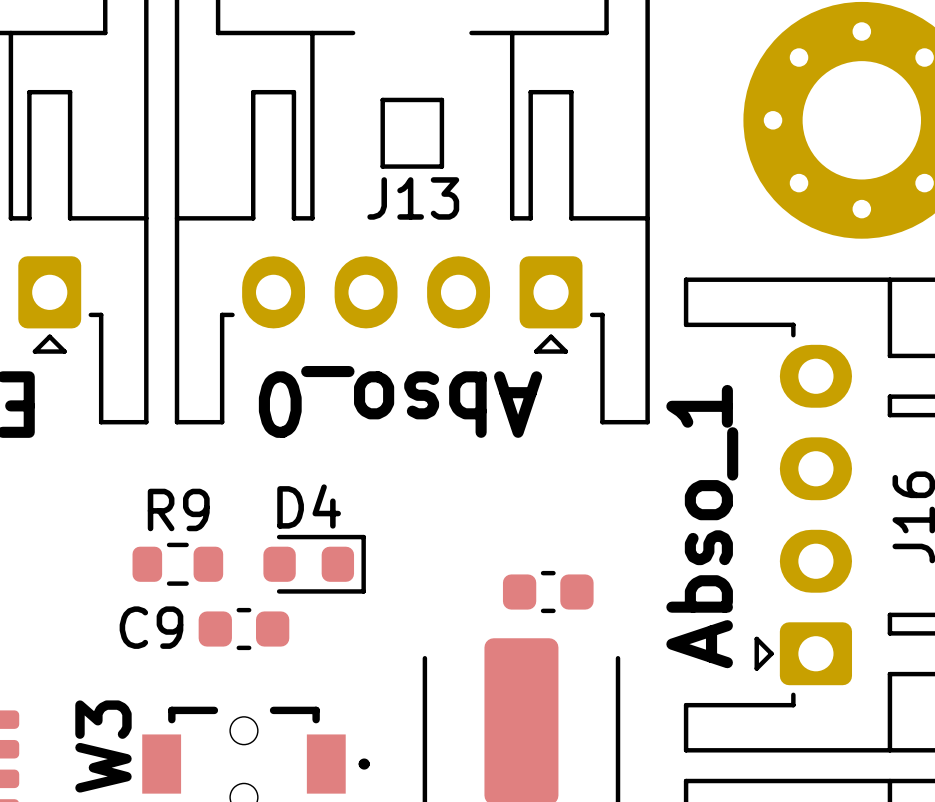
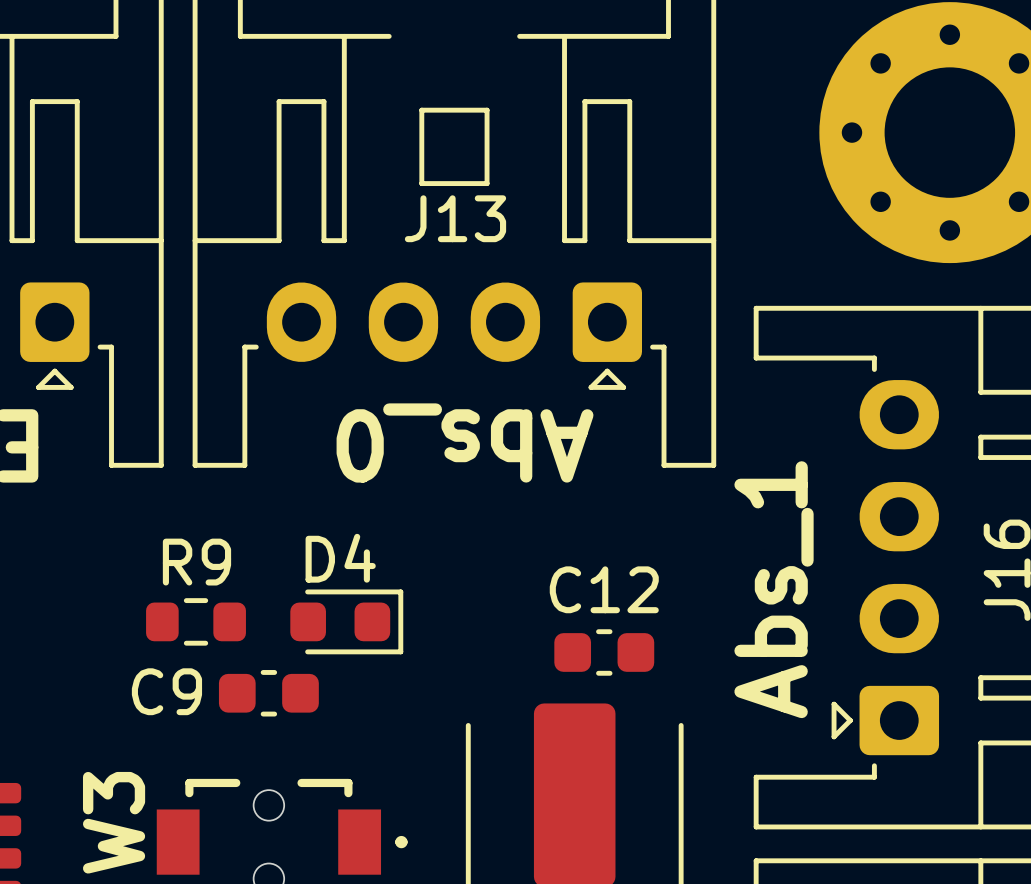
text: Abso_0 (400, 401) -> Abs_0 (465, 442)
text: Abso_1 (702, 526) -> Abs_1 (774, 589)
C12 name: none -> C12 (604, 589)

